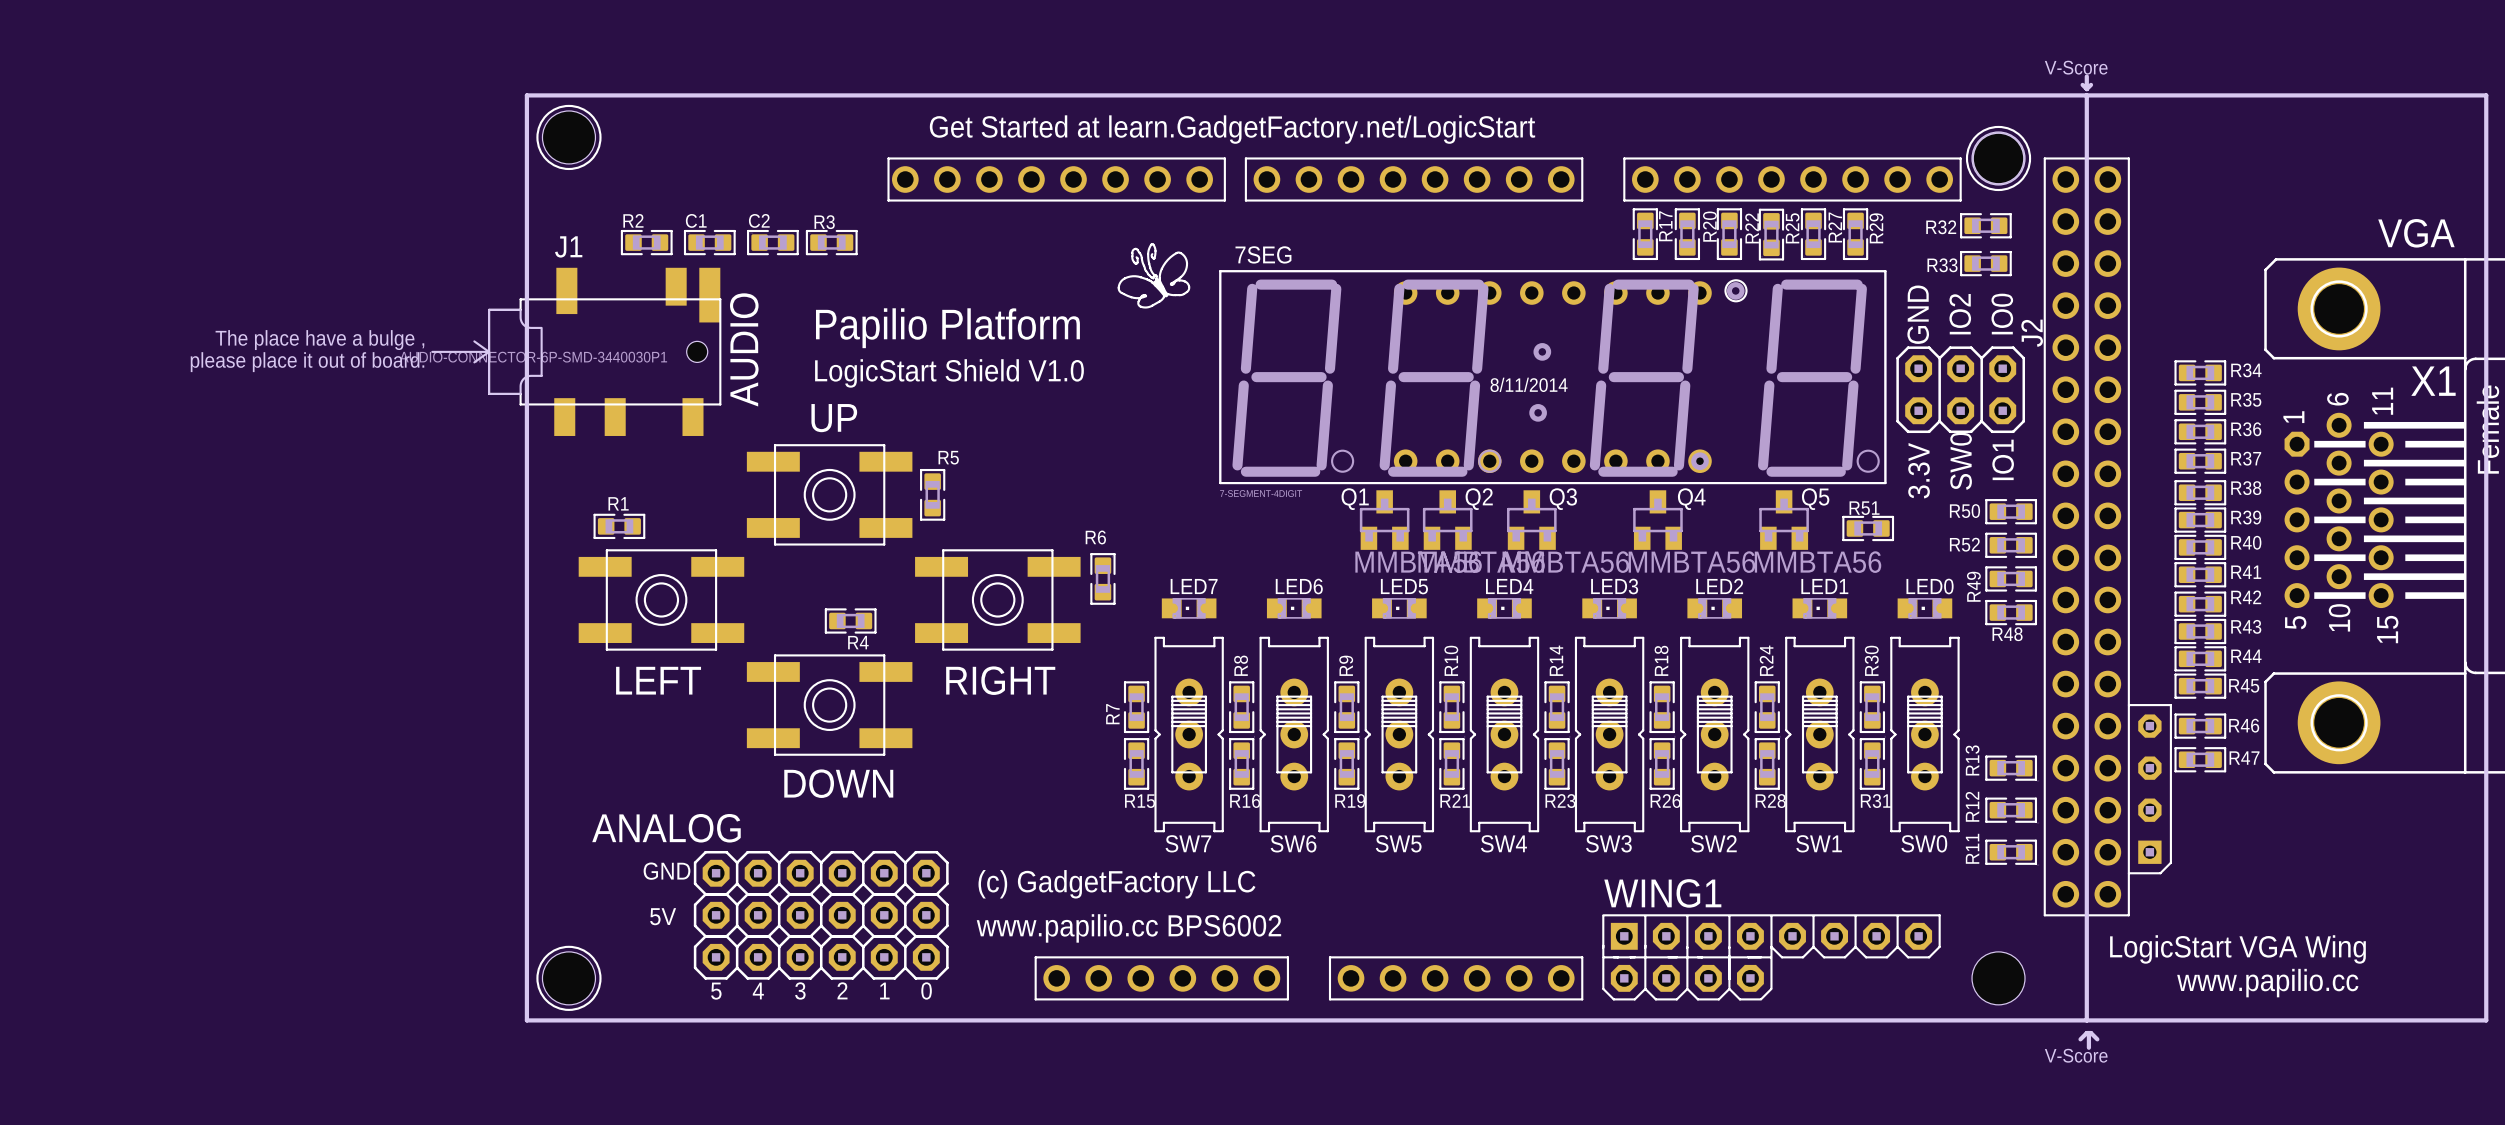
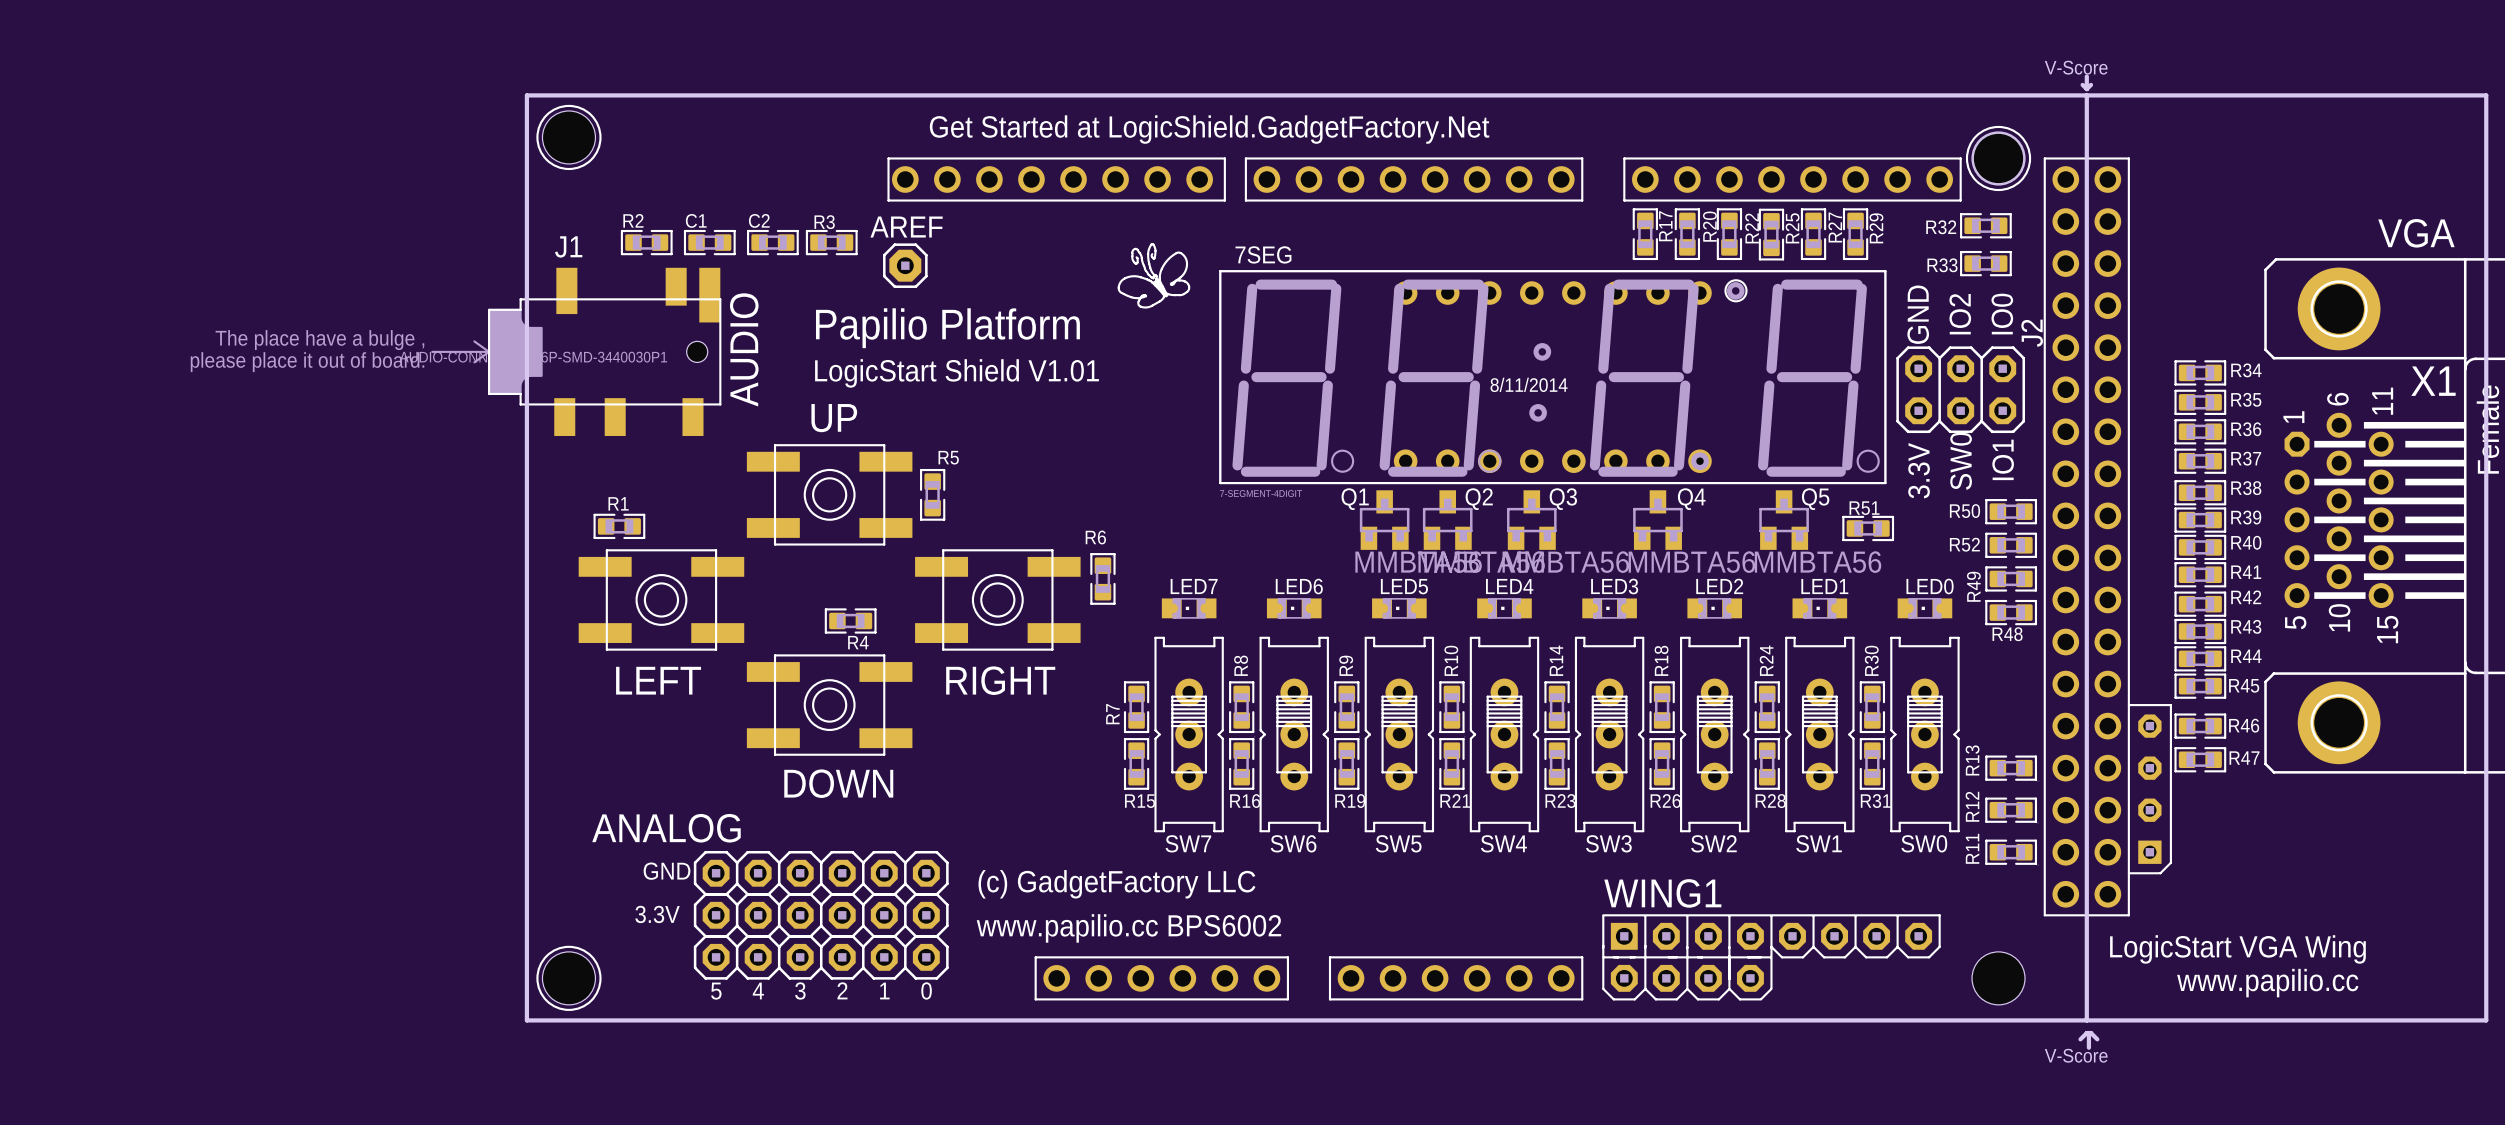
text: Get Started at learn.GadgetFactory.net/LogicStart (1232, 129) -> Get Started at LogicShield.GadgetFactory.Net (1209, 129)
AREF: none -> (905, 265)
J1 footprint: [431, 267, 722, 436] -> [431, 267, 722, 436]
text: LogicStart Shield V1.0 (949, 373) -> LogicStart Shield V1.01 (957, 373)
text: 5V (663, 916) -> 3.3V (657, 914)

